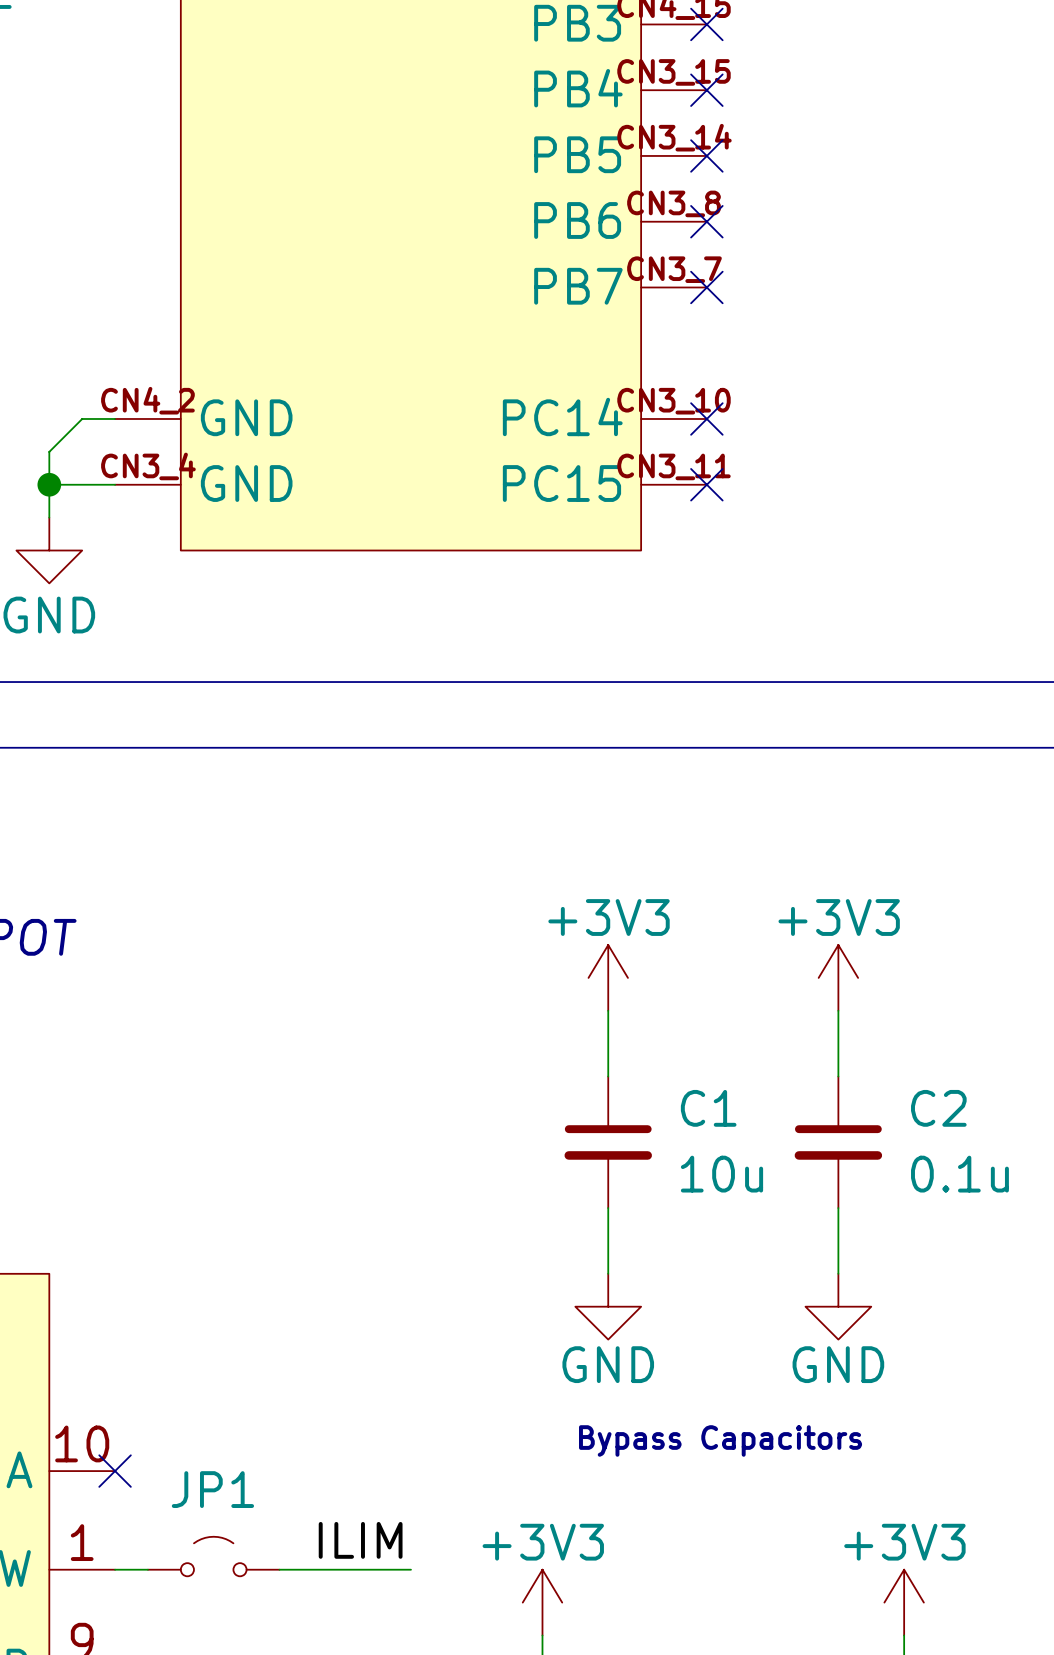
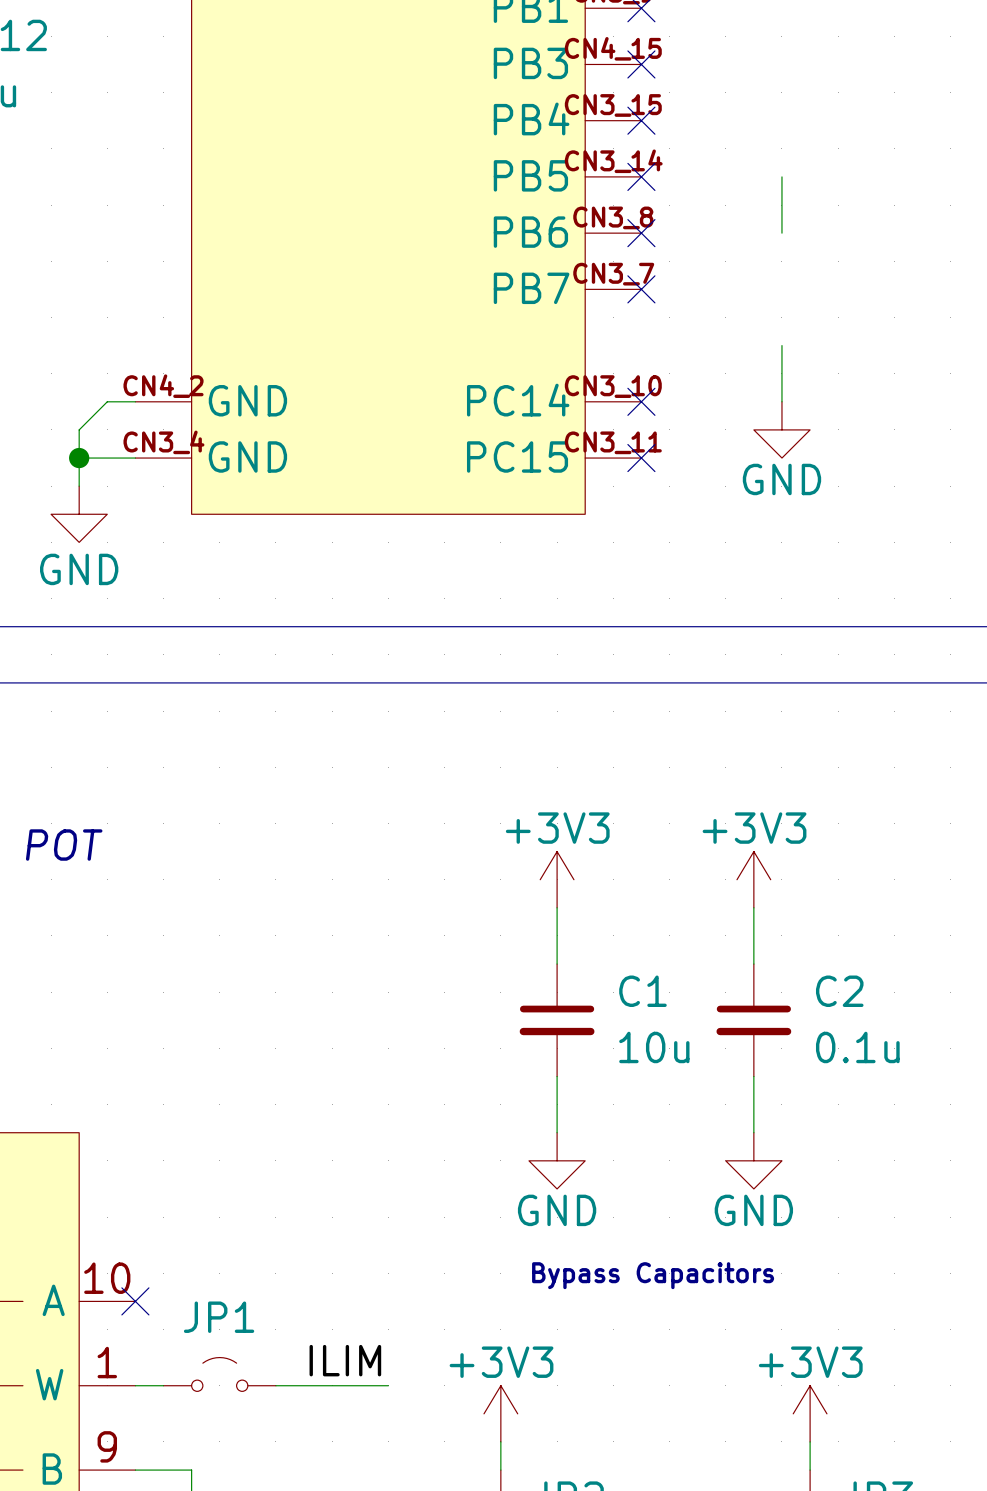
wire: none -> (781, 176) (781, 233)
wire: none -> (781, 345) (781, 401)
power symbol: none -> GND (781, 429)

